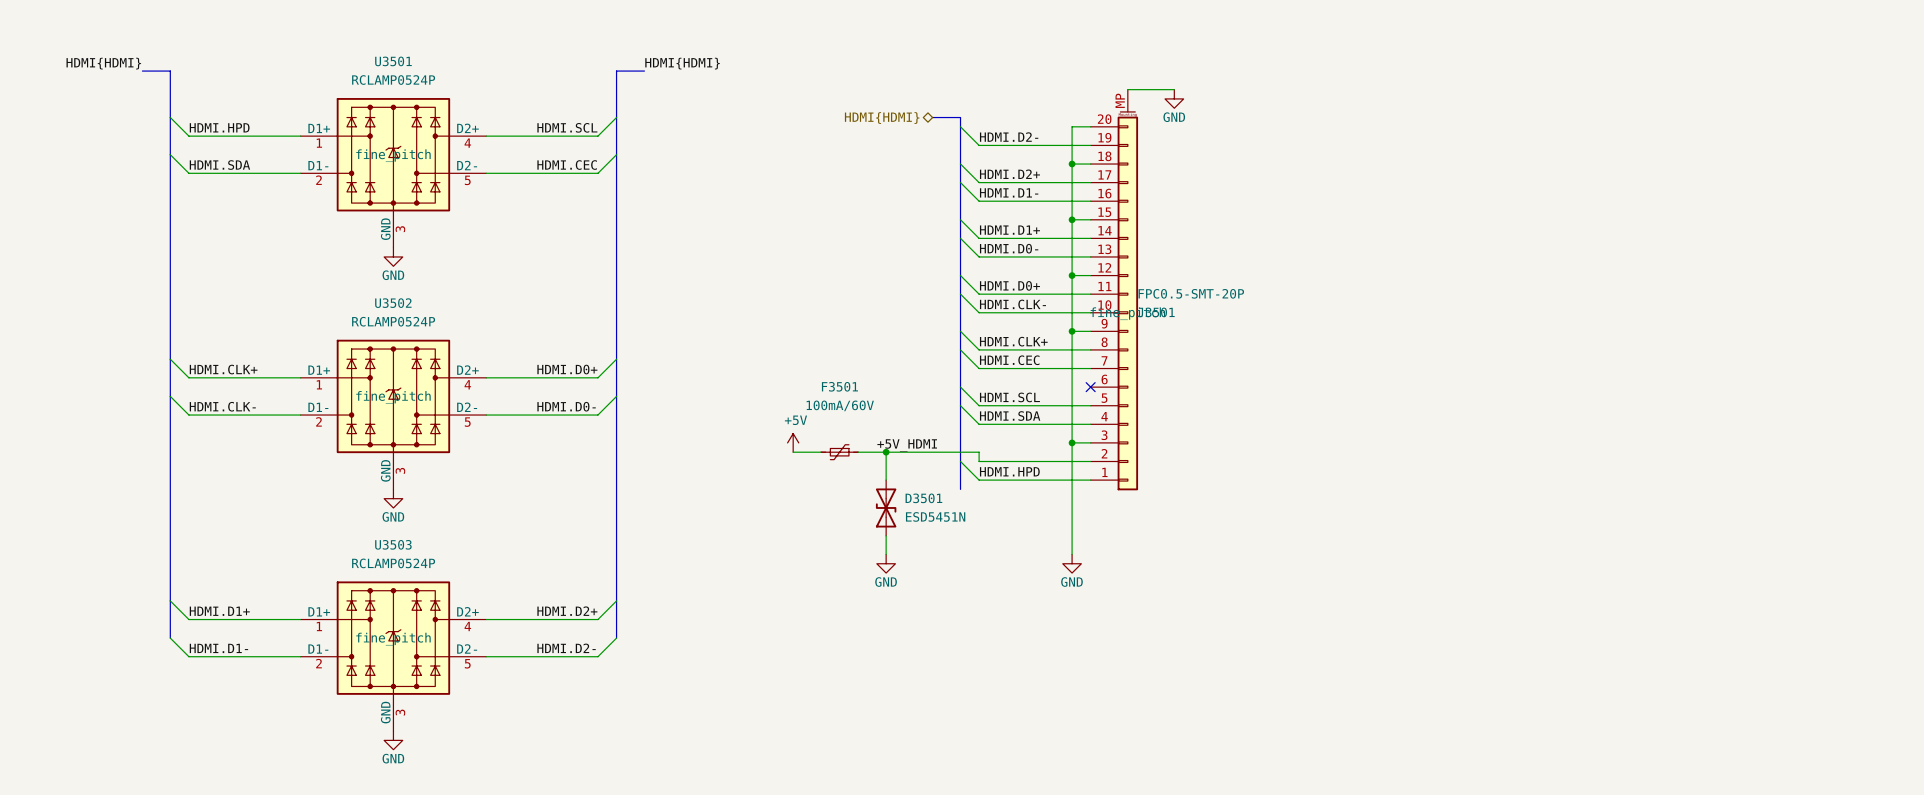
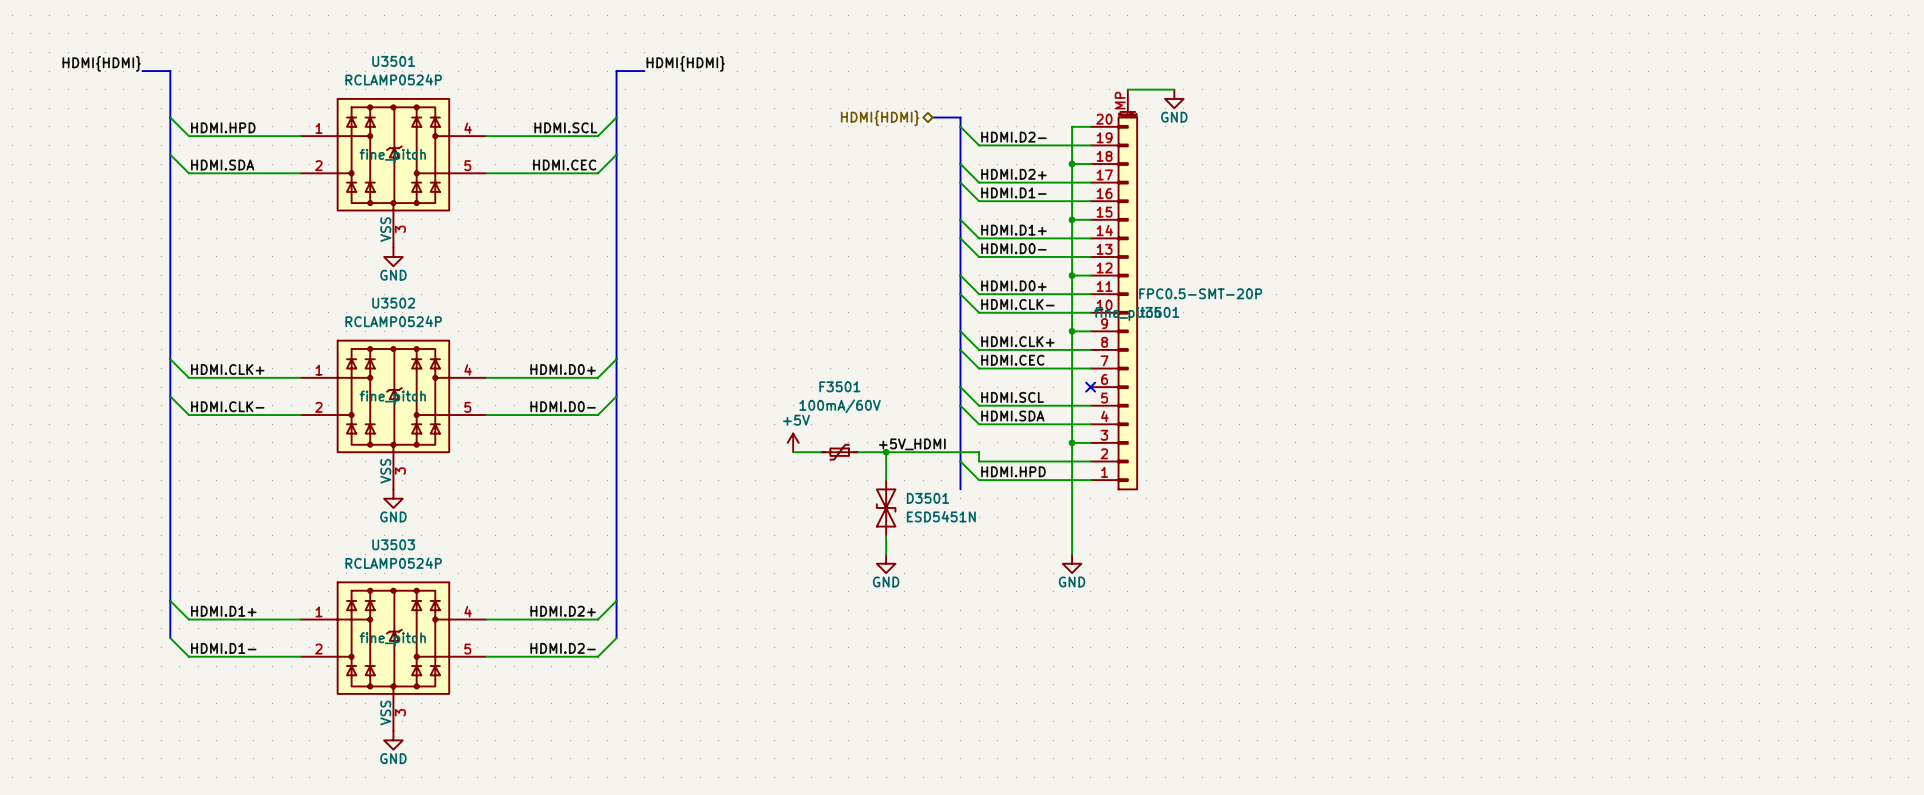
U3501 symbol: [300, 98, 487, 248] -> [300, 98, 487, 248]
U3502 symbol: [300, 339, 487, 490] -> [300, 339, 487, 490]
U3503 symbol: [300, 581, 487, 732] -> [300, 581, 487, 732]

